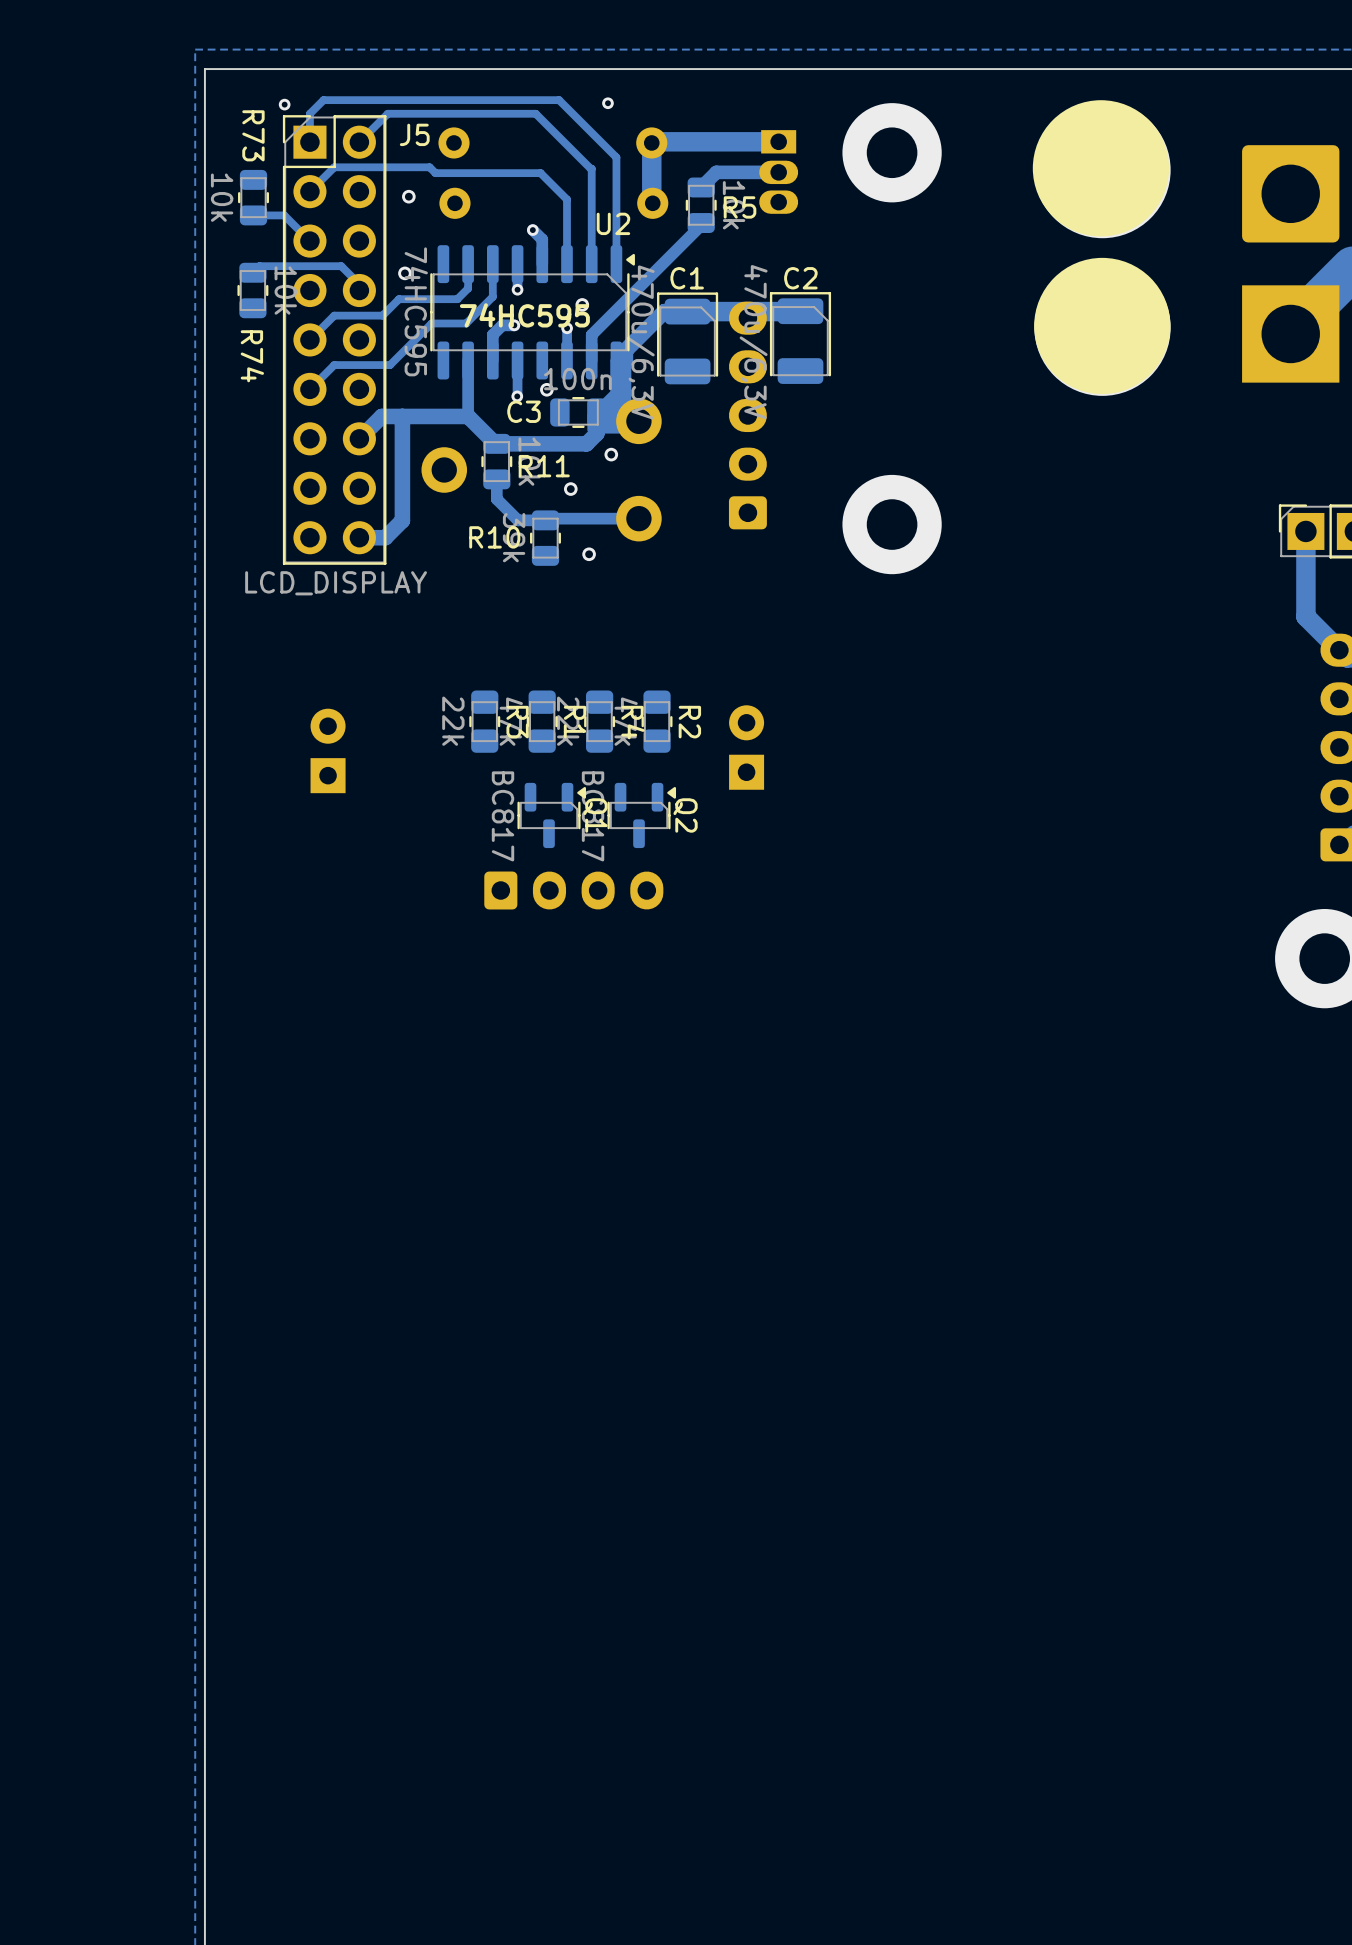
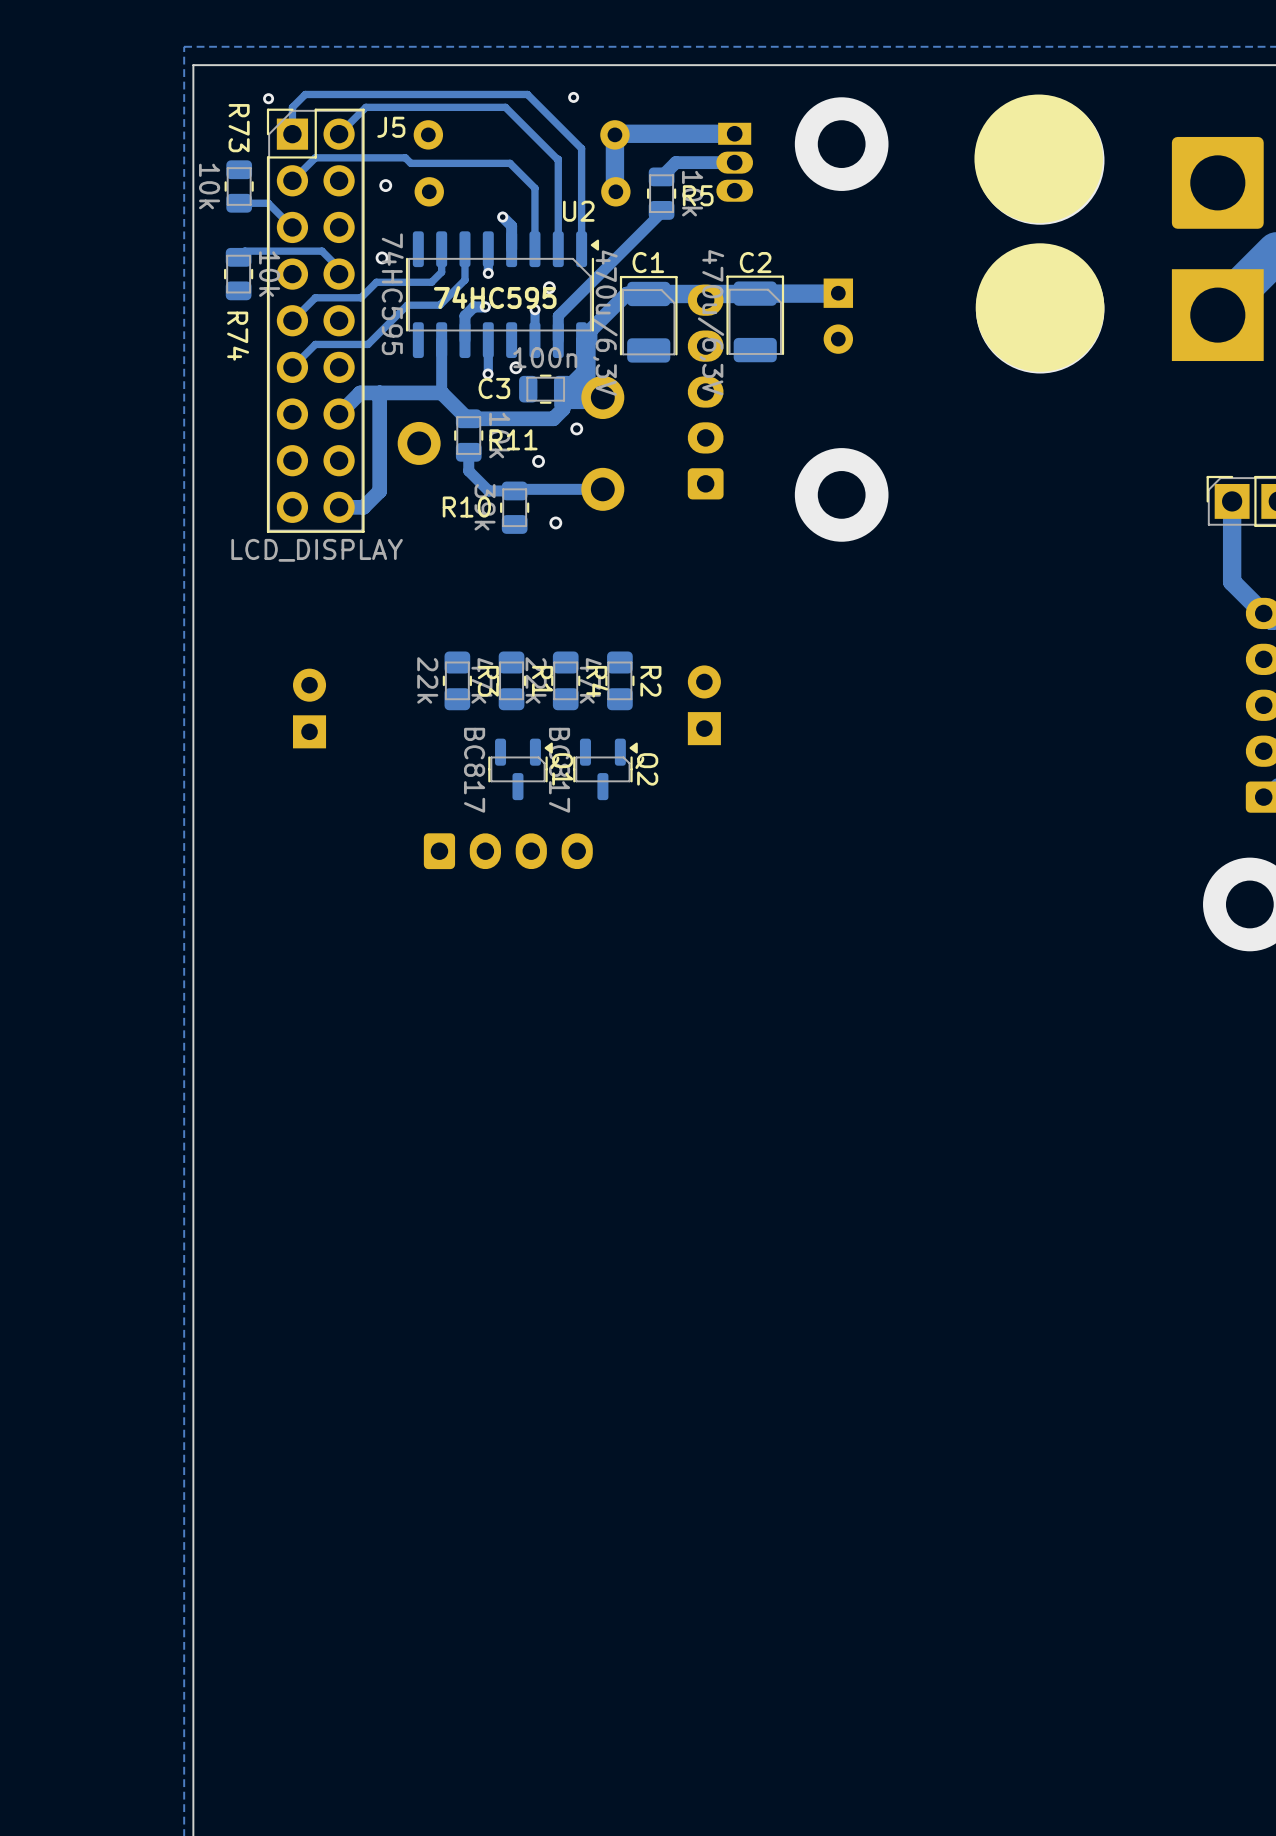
track: none -> (838, 293) (755, 293)
part: none -> (838, 316)
part position: (573, 890) -> (508, 851)

